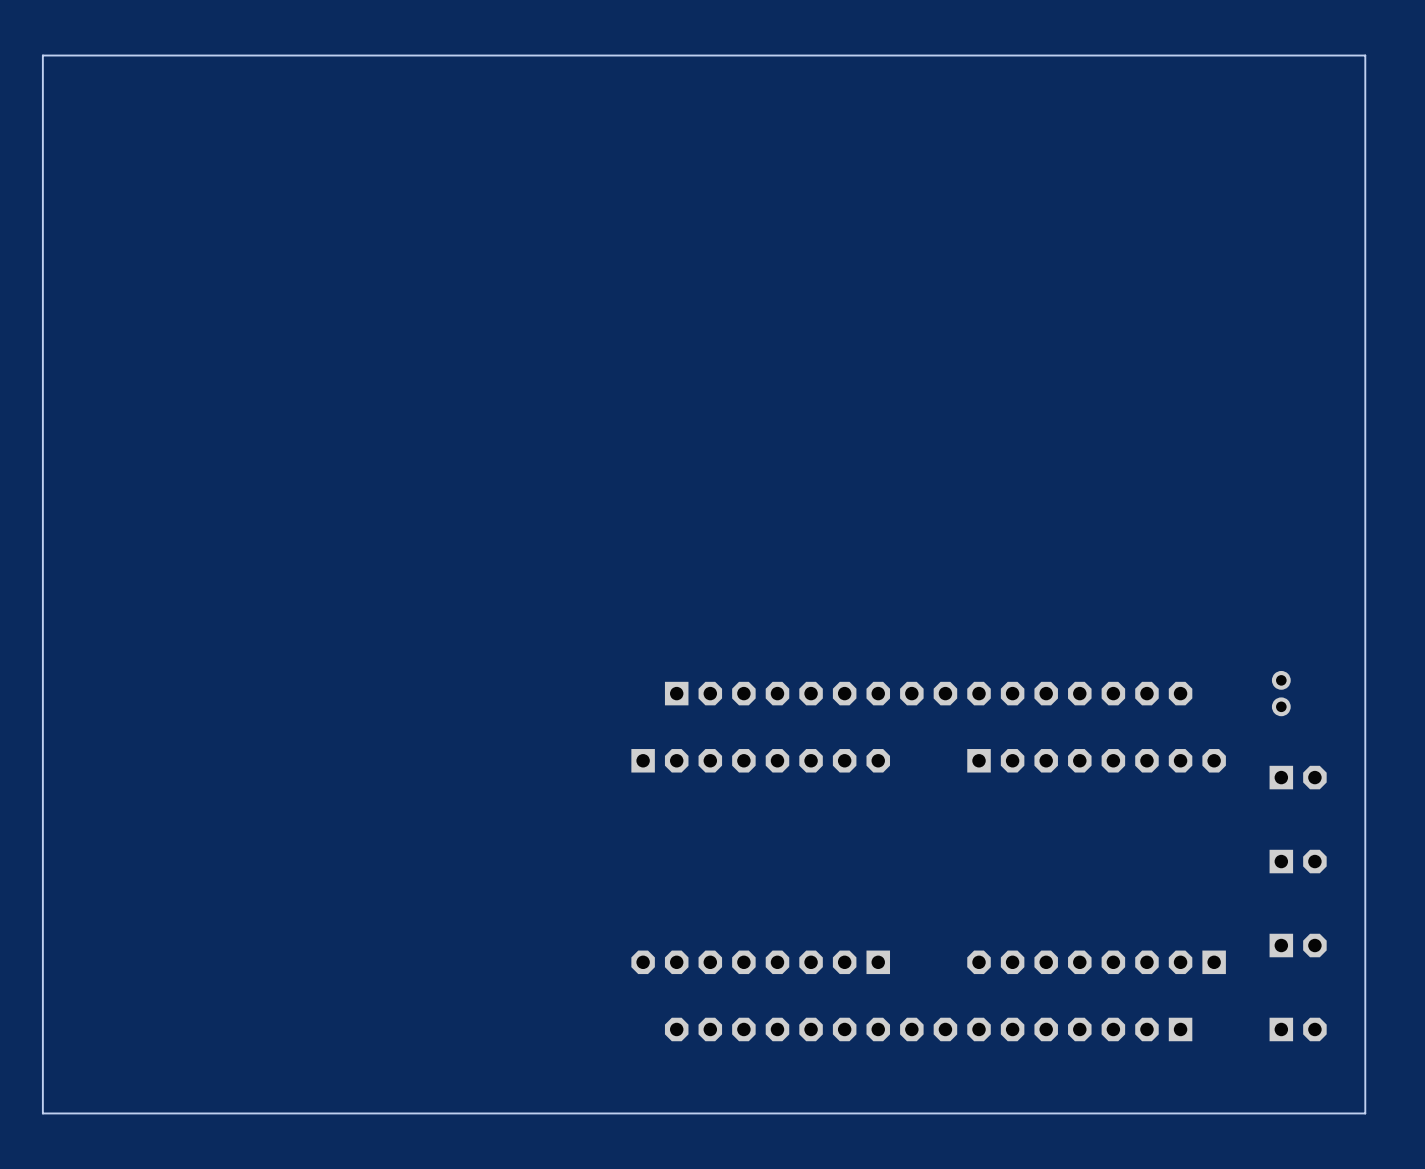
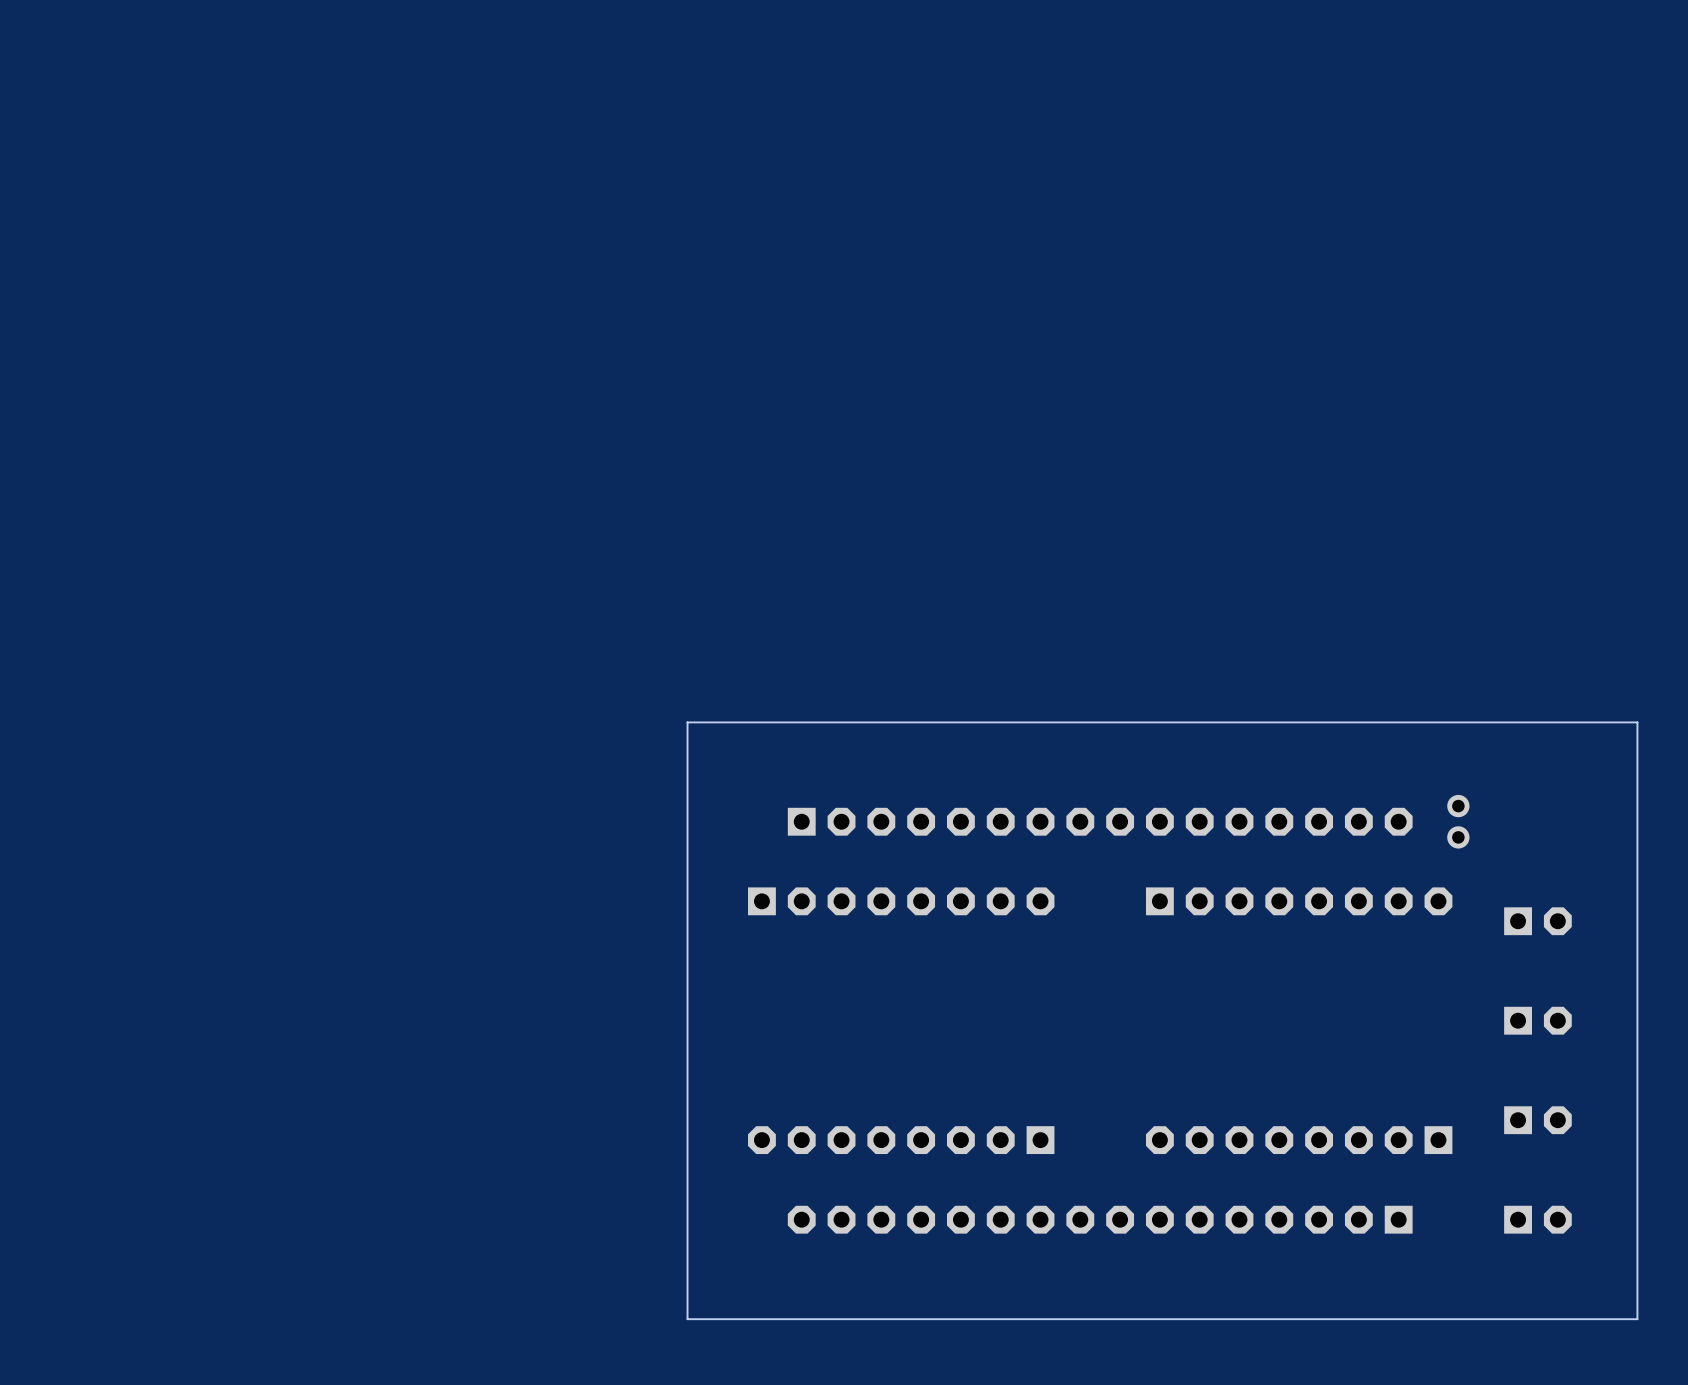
part position: (1281, 693) -> (1458, 821)
board edge: (1365, 1113) (1365, 55) (42, 55) (42, 1113) (580, 1113) -> (1617, 1319) (1637, 1319) (1637, 722) (687, 722) (687, 1319)

